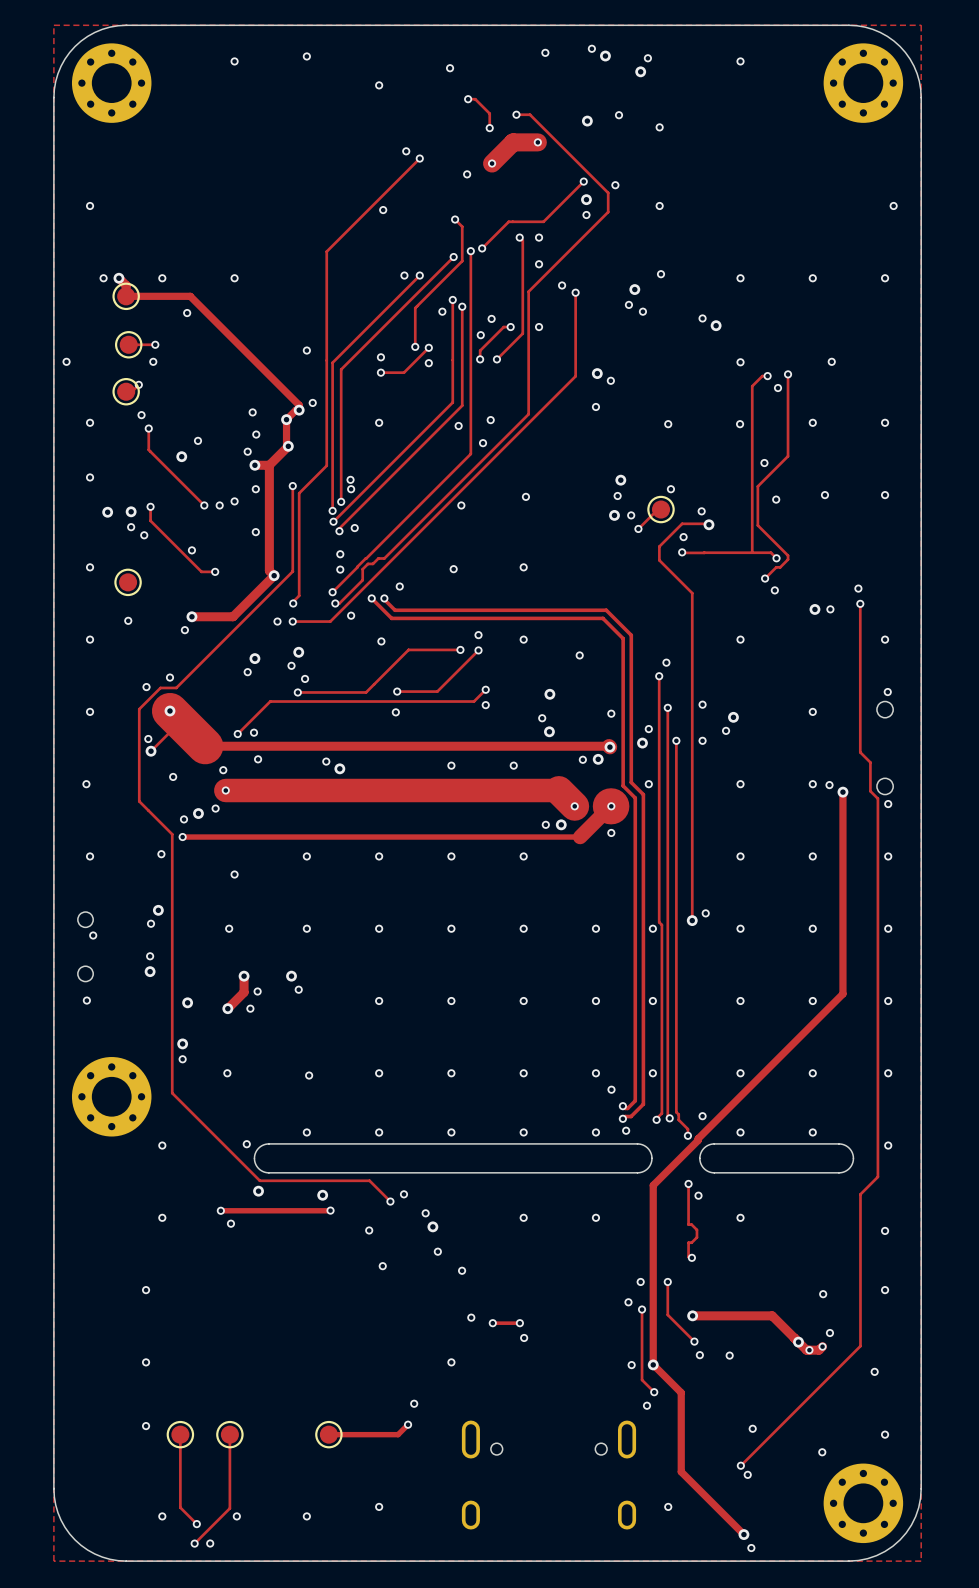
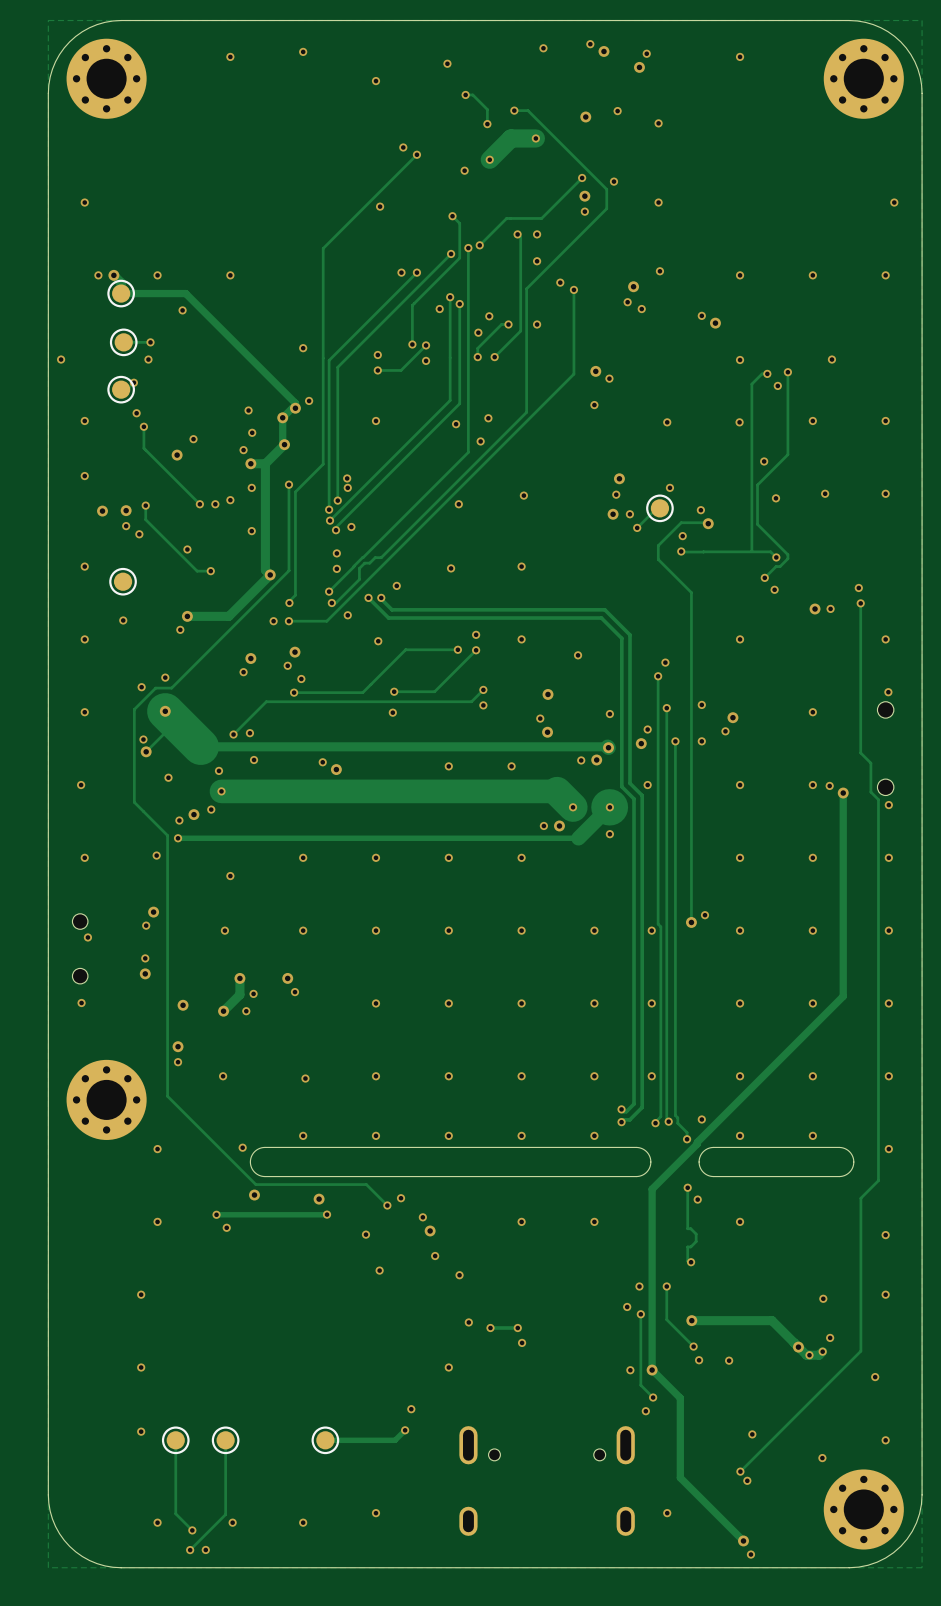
via: (611, 1089) -> none
via: (626, 1130) -> none

